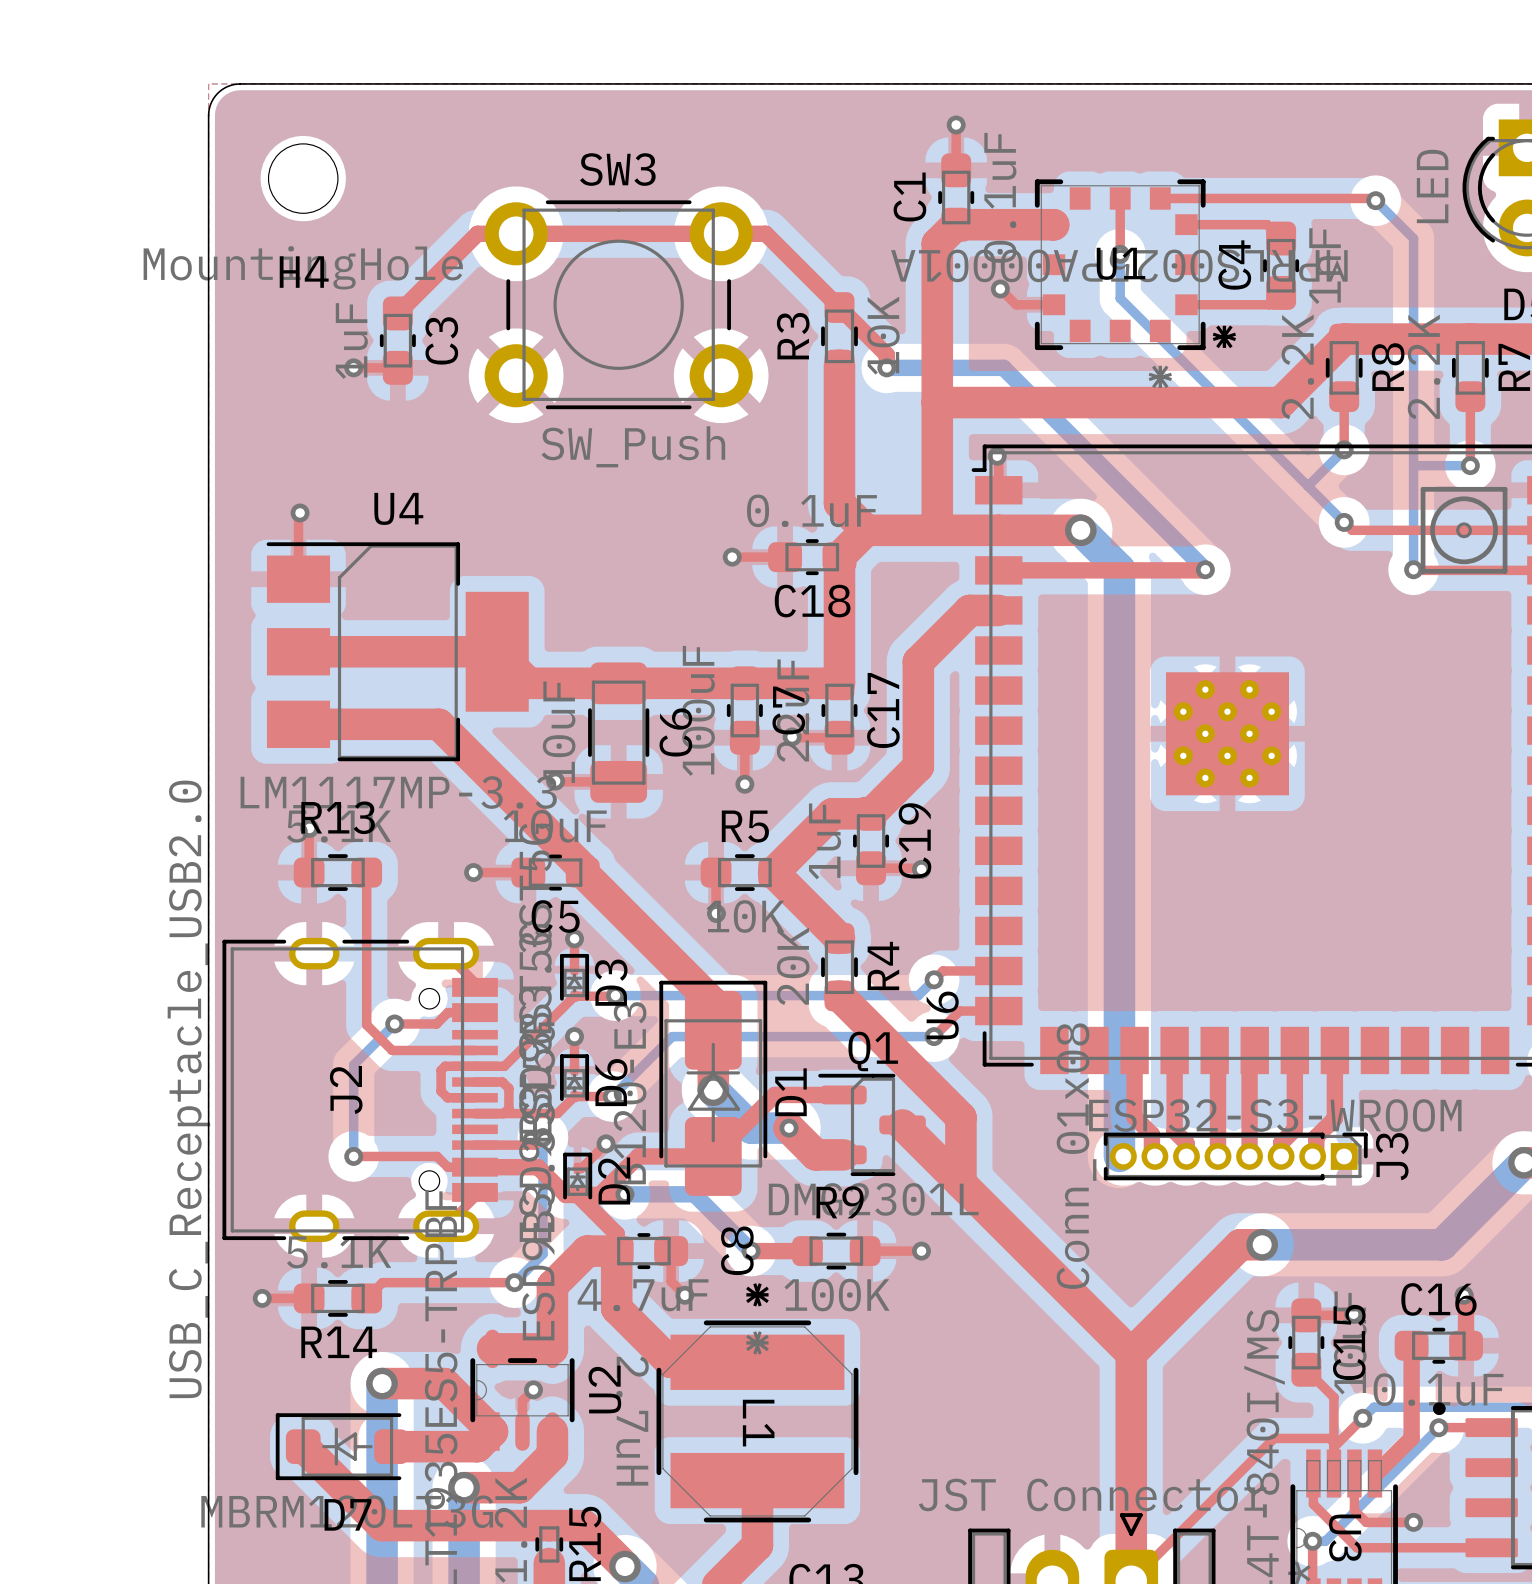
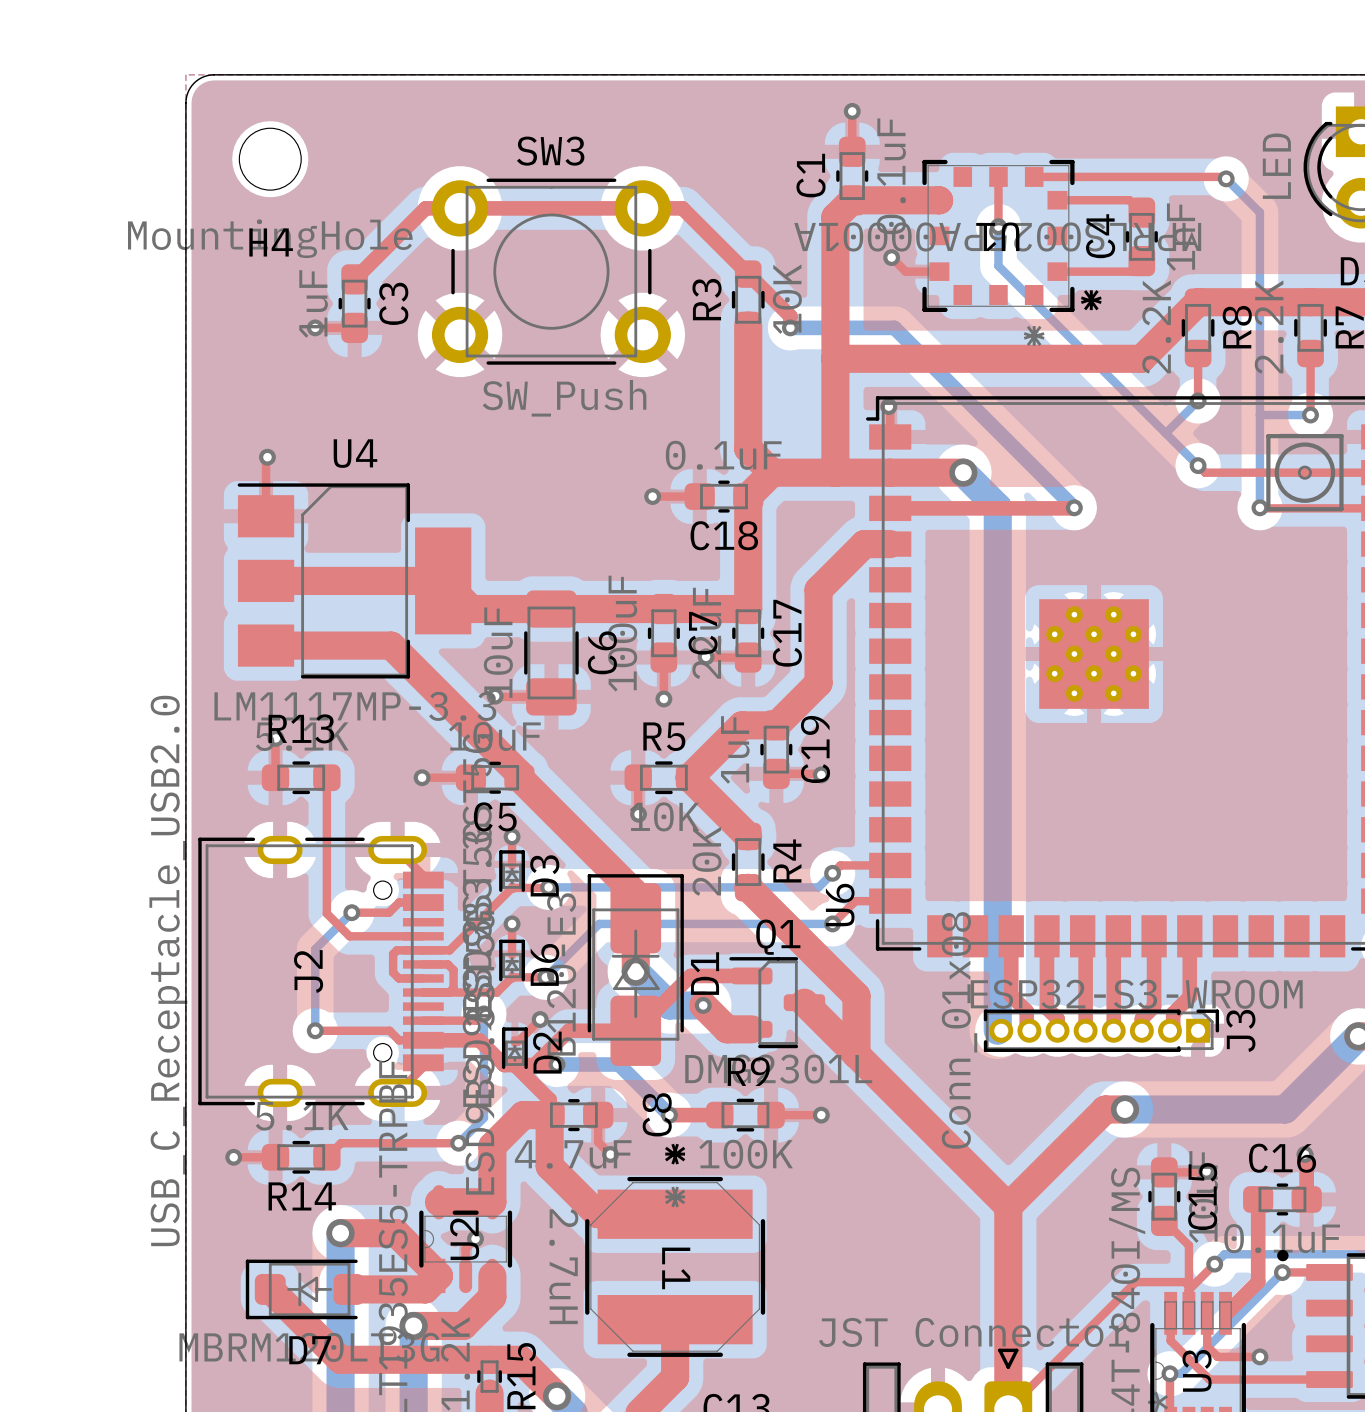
U1 name rotation: 0° (1120, 263) -> 180° (997, 236)
U2 name position: U2 (604, 1389) -> U2 (464, 1238)
U3 name rotation: 0° (1345, 1537) -> 180° (1197, 1370)

